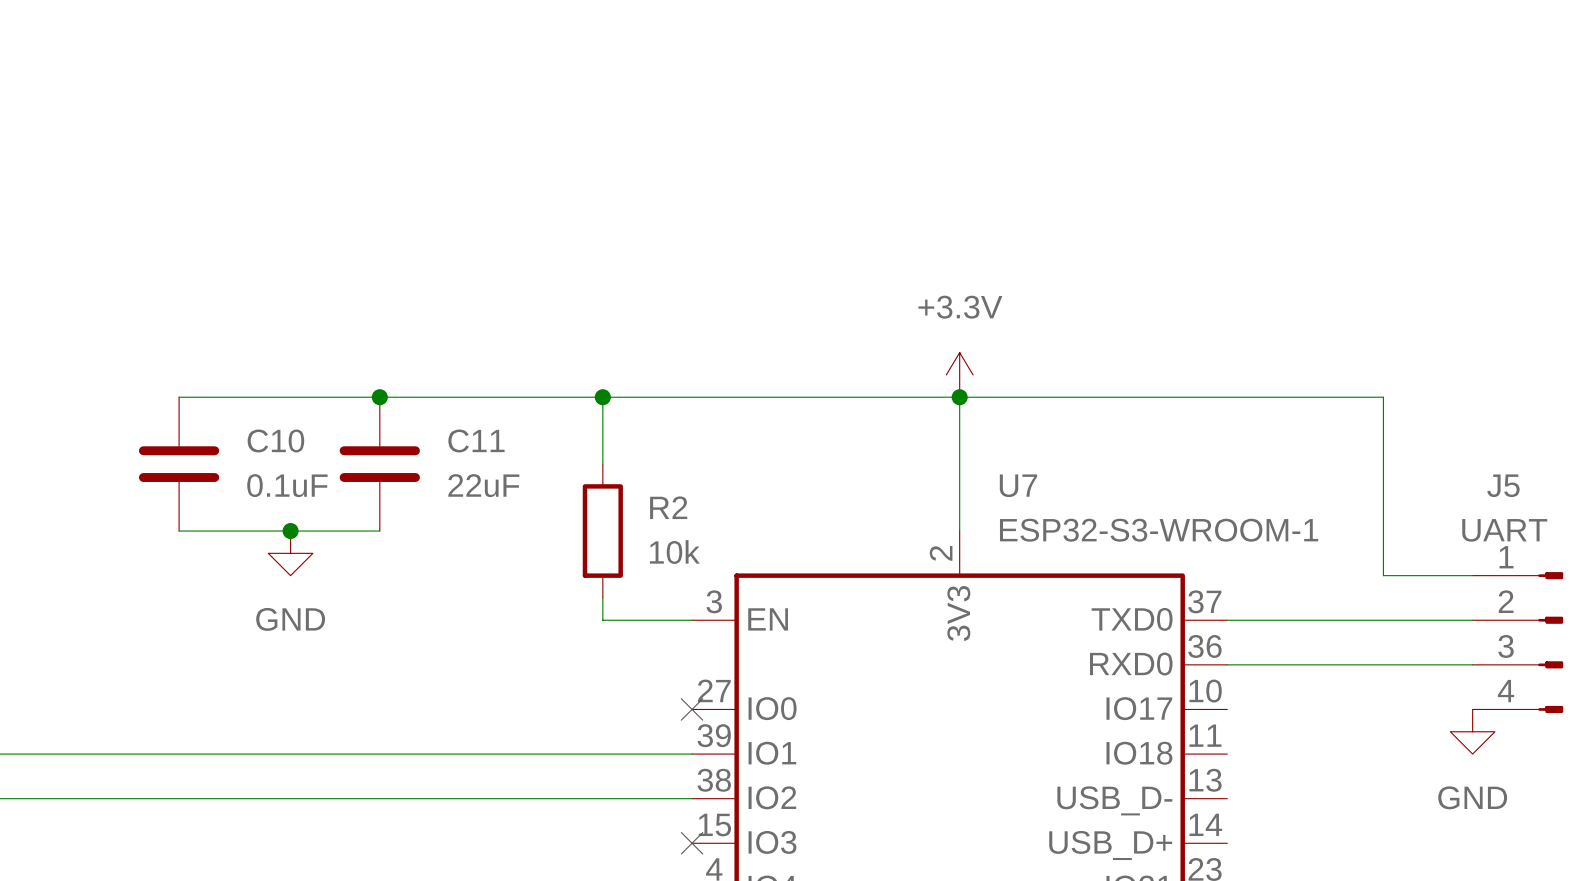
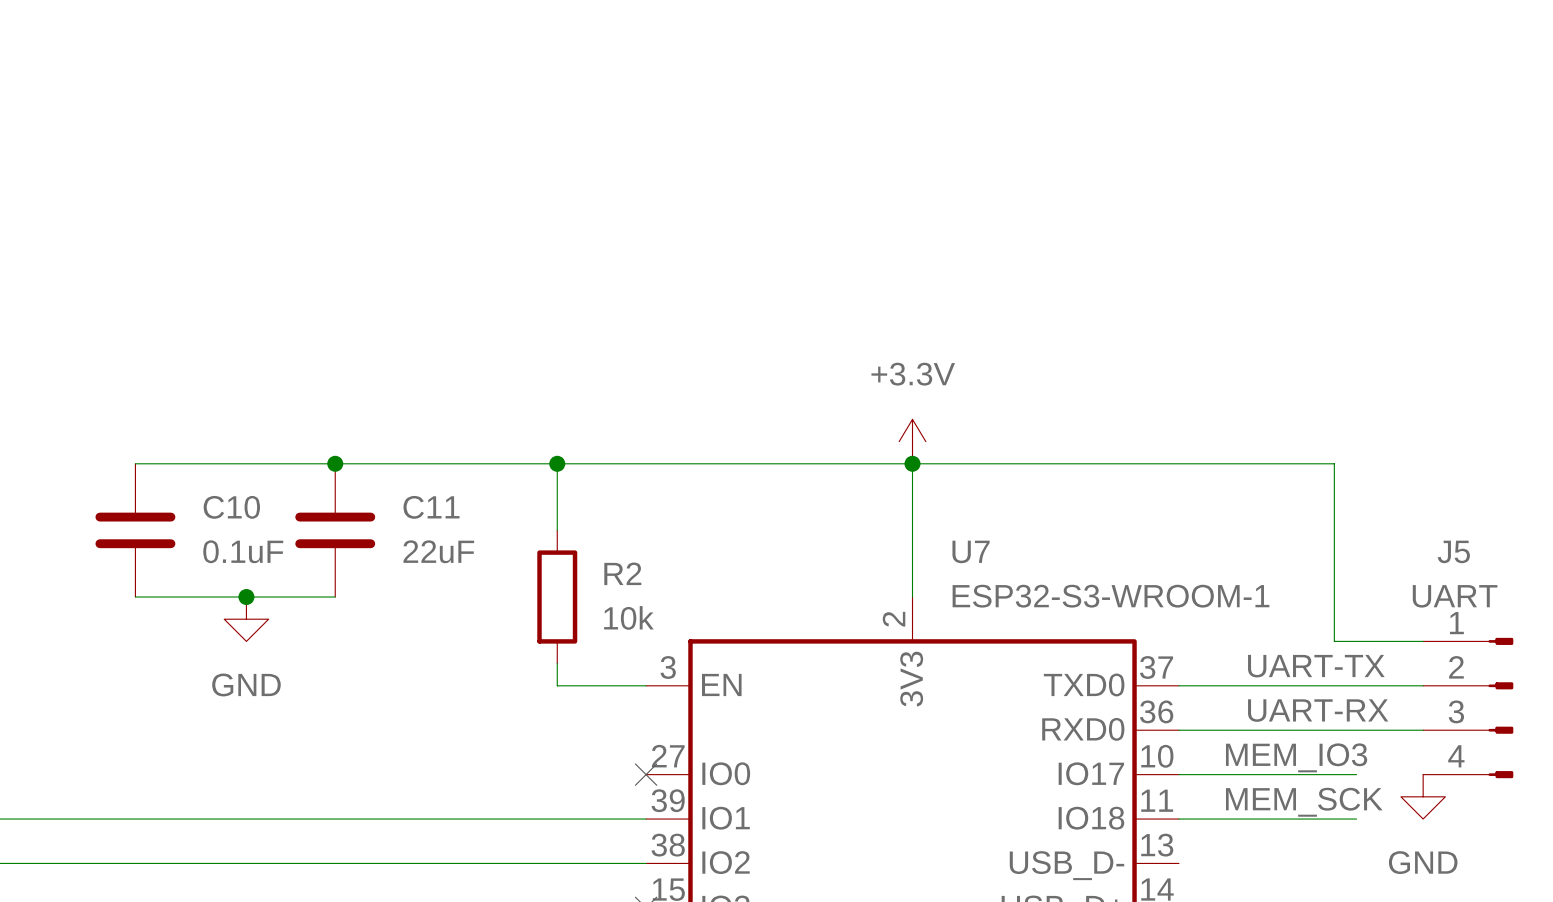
label: none -> UART-TX (1316, 666)
label: none -> UART-RX (1318, 710)
label: none -> MEM_IO3 (1296, 757)
wire: none -> (1178, 774) (1356, 774)
label: none -> MEM_SCK (1304, 802)
wire: none -> (1178, 819) (1356, 819)

